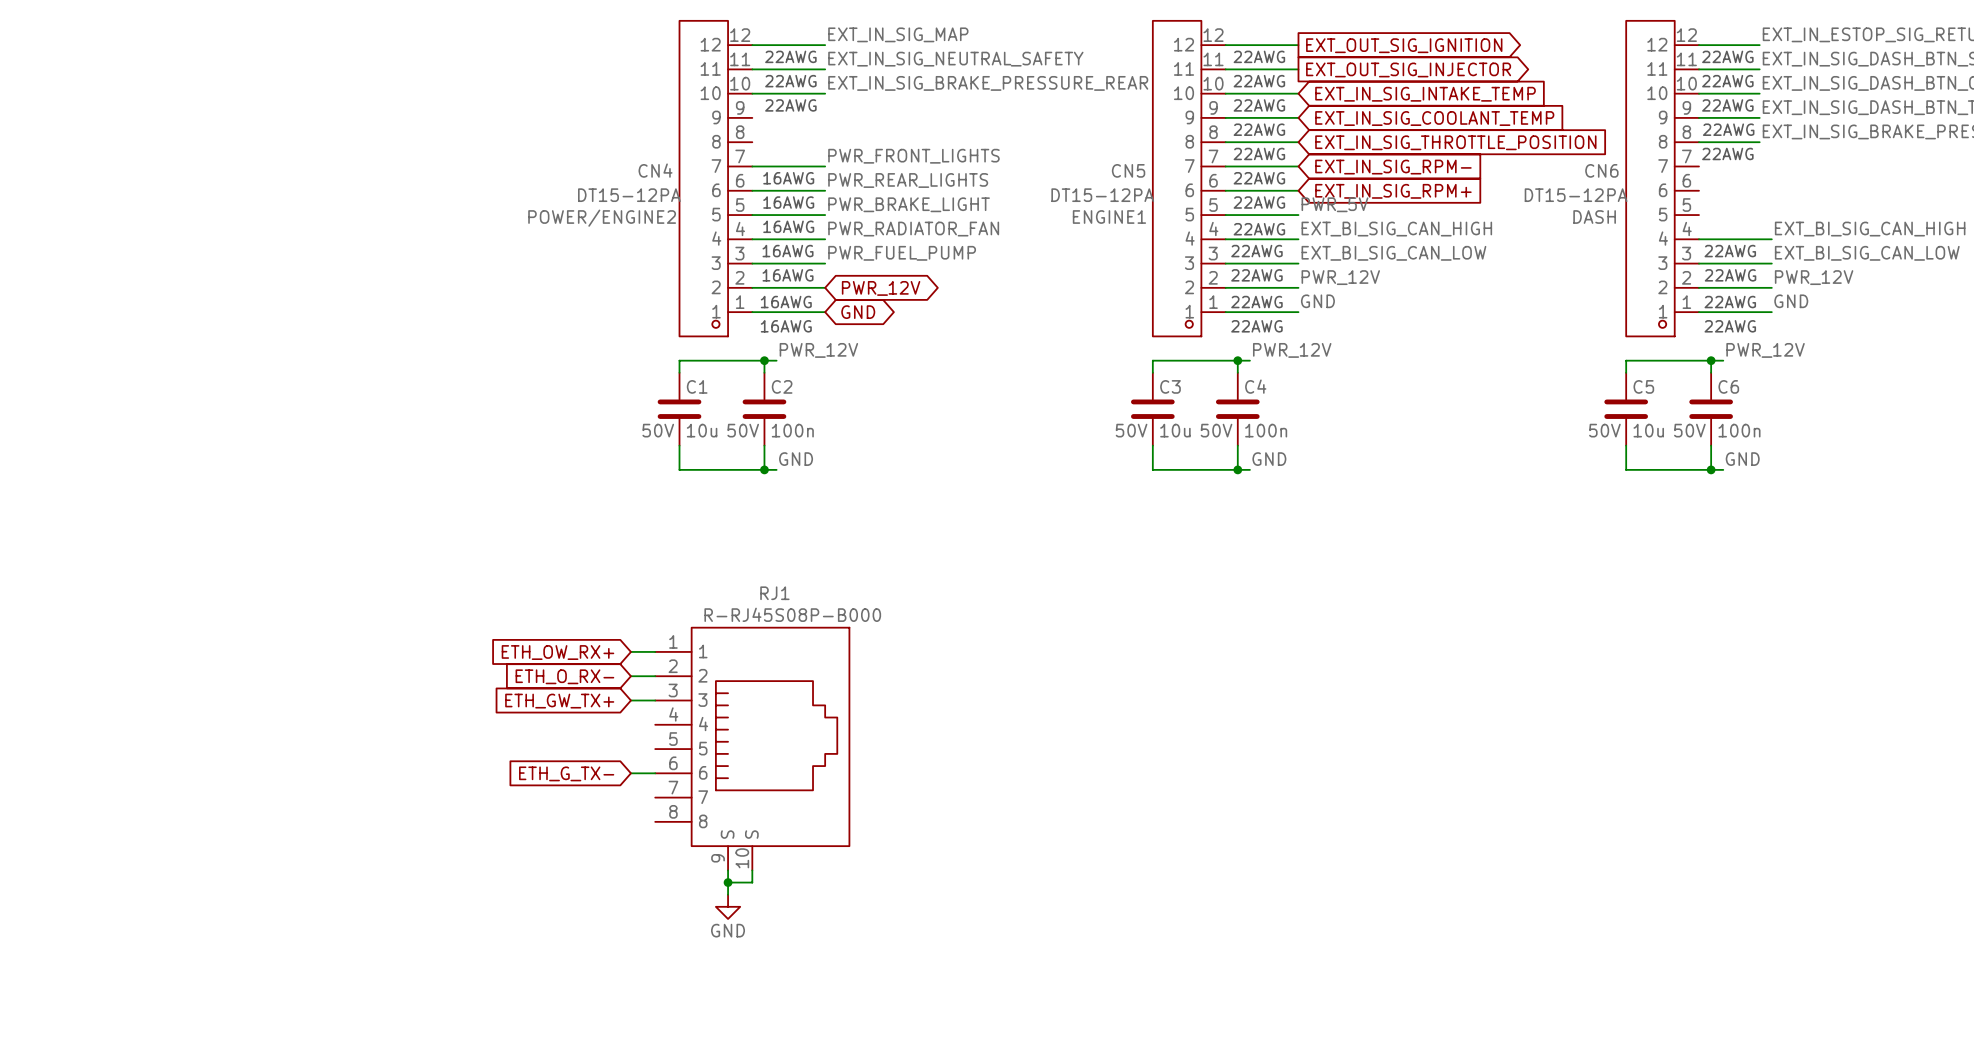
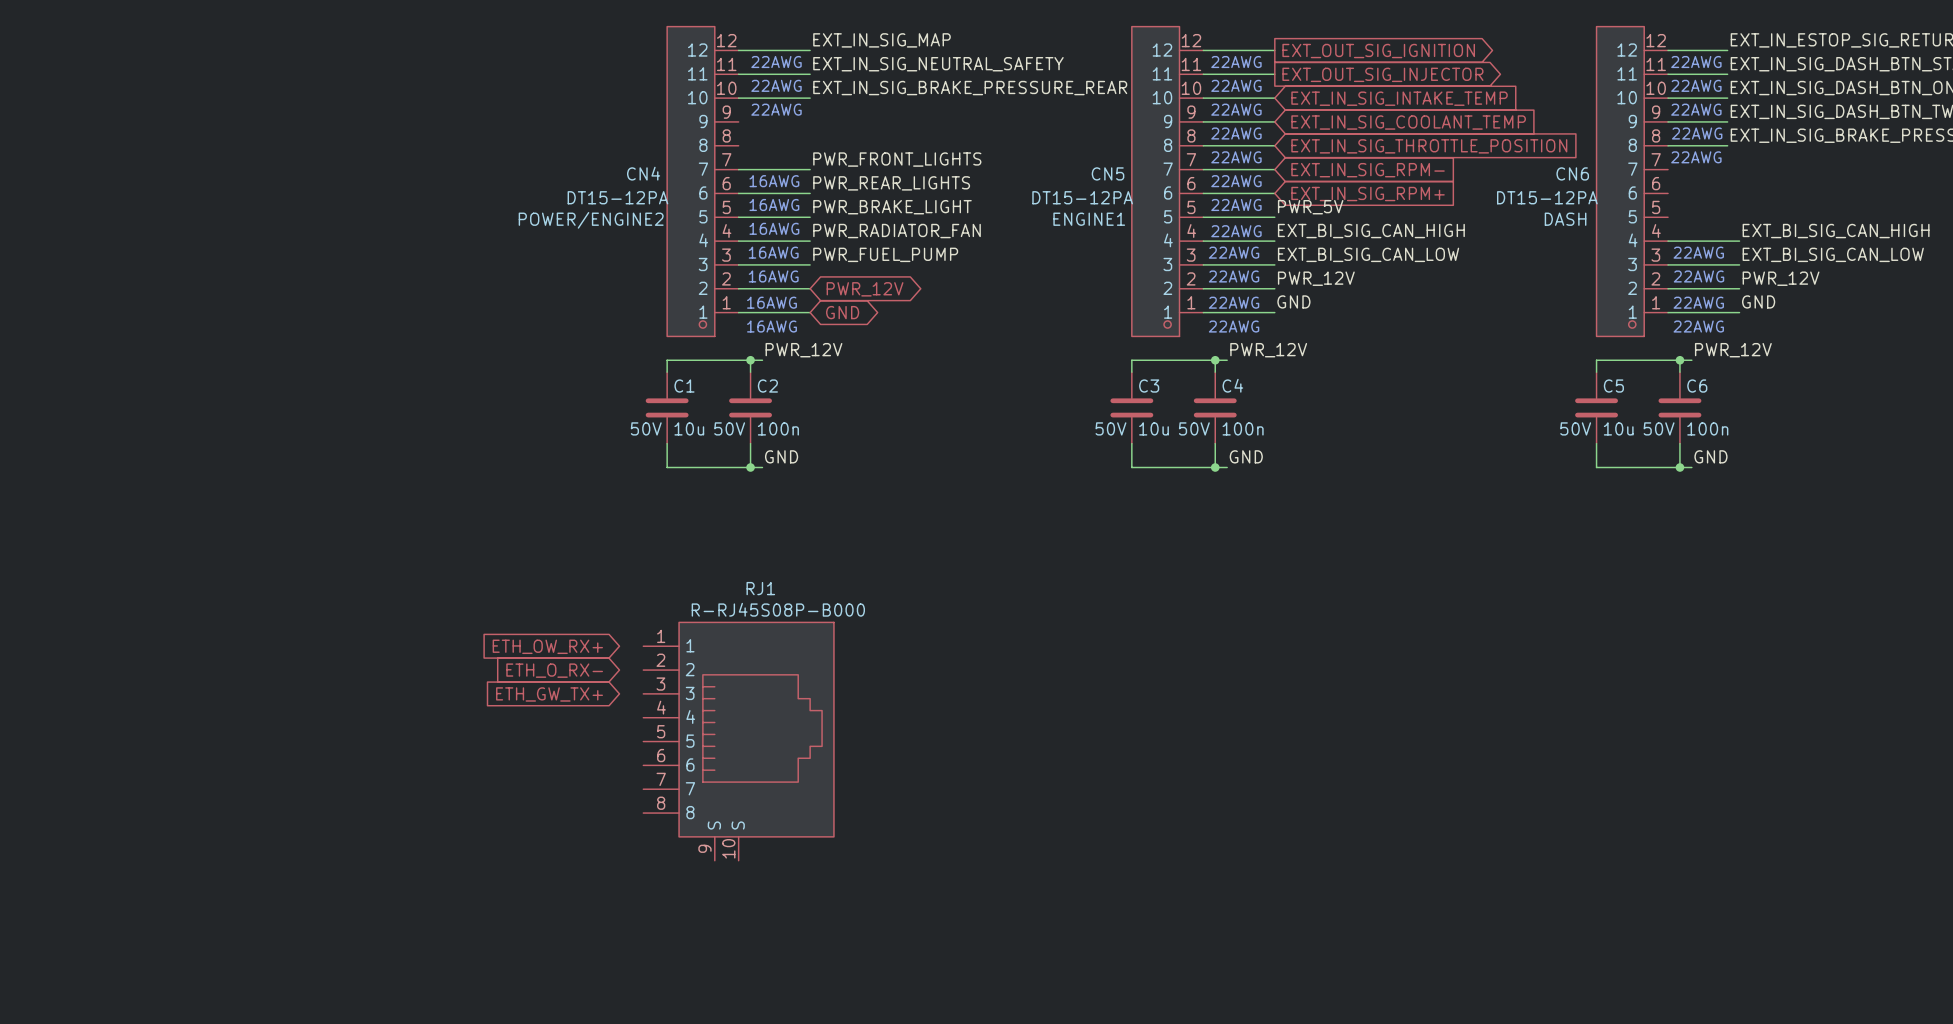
wire: (630, 651) (655, 651) -> none
wire: (630, 676) (655, 676) -> none
wire: (630, 700) (655, 700) -> none
global label: ETH_G_TX- (566, 773) -> none
wire: (630, 773) (655, 773) -> none
wire: (728, 870) (728, 894) -> none
wire: (752, 870) (752, 882) (728, 882) -> none
junction: (728, 882) -> none
power symbol: GND (728, 906) -> none

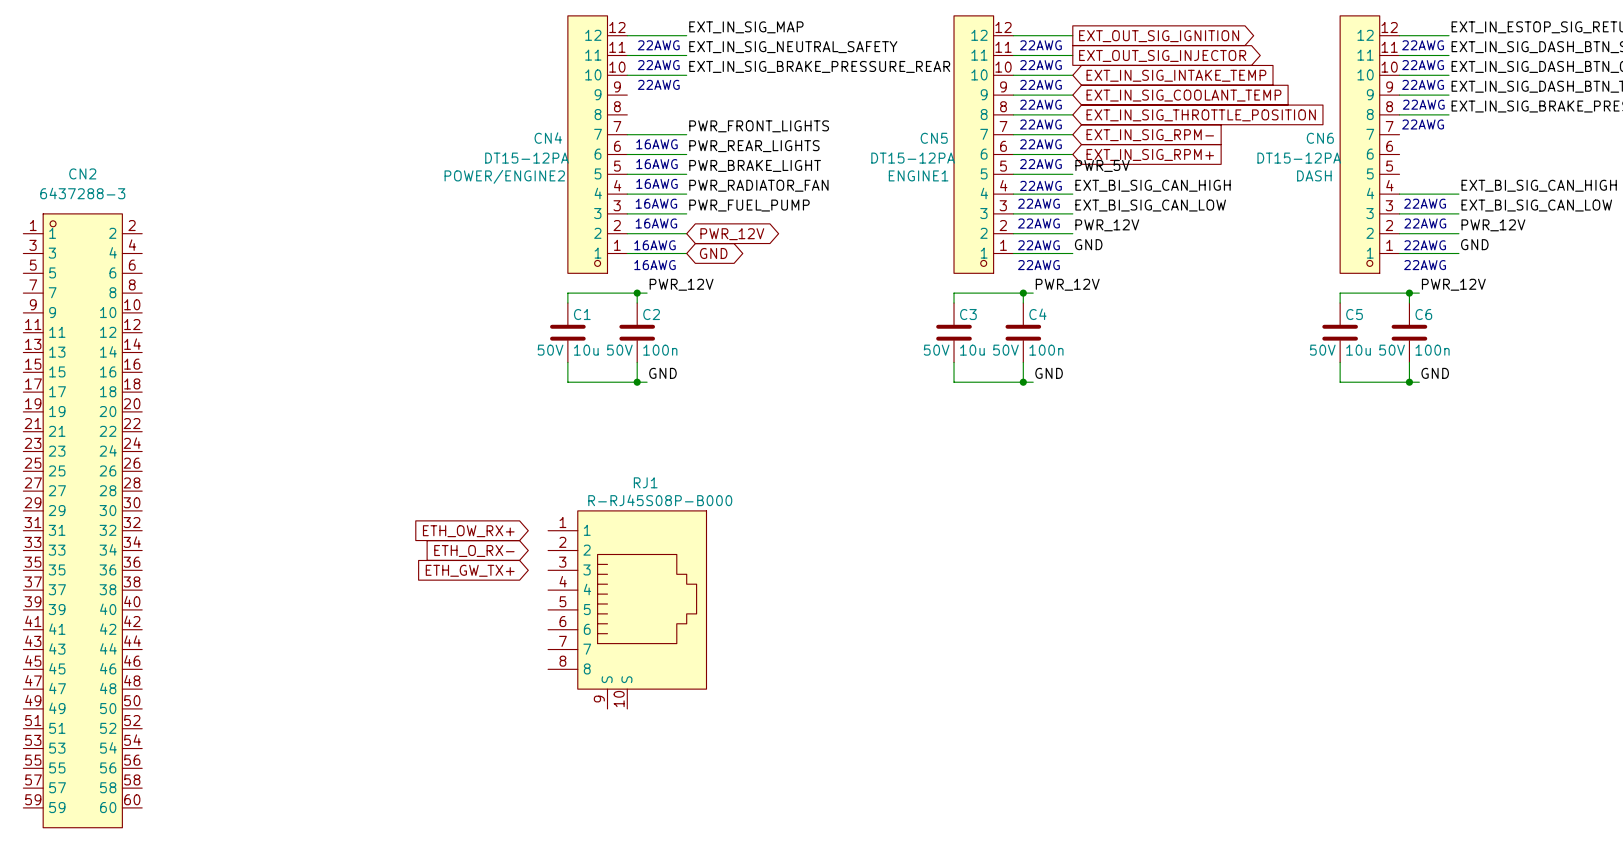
CN2: none -> 6437288-3 (82, 520)

